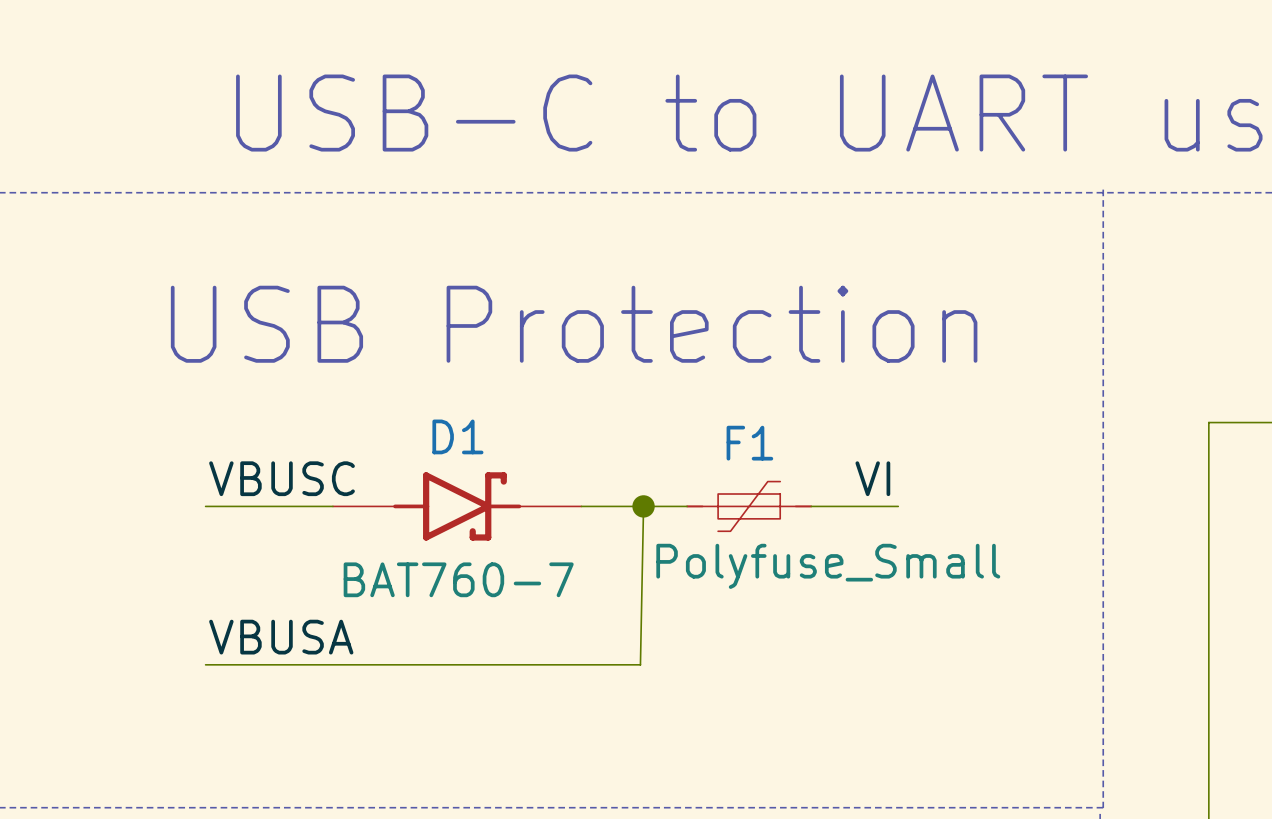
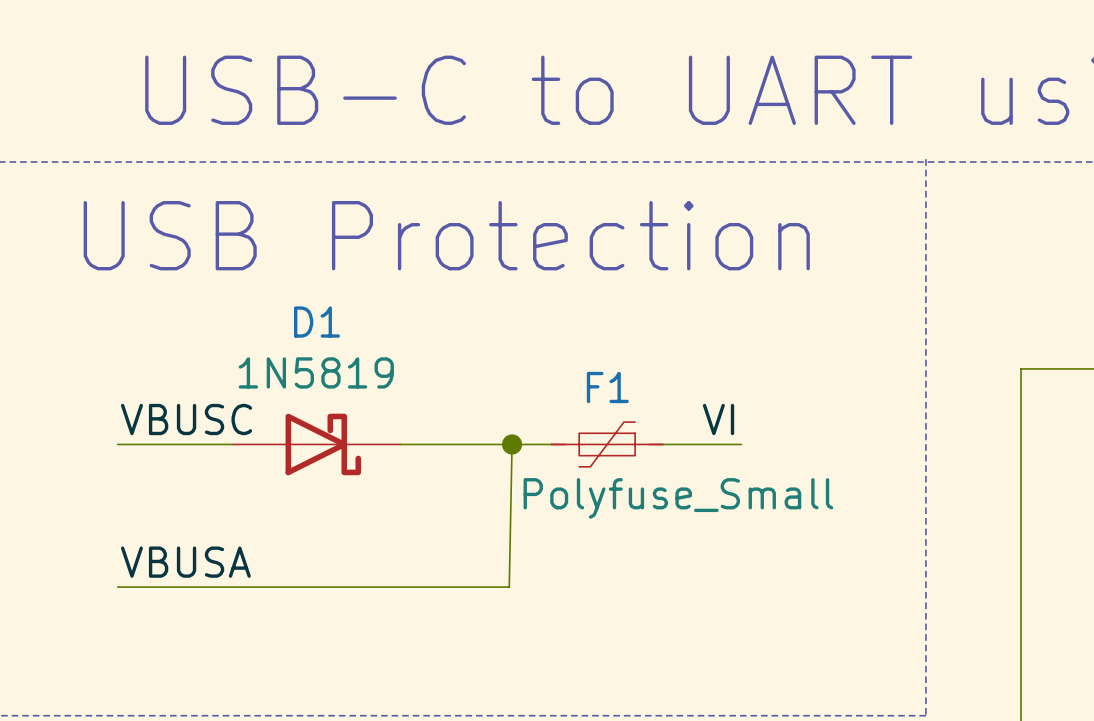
text position: USB Protection (574, 324) -> USB Protection (446, 235)
D1 name position: D1 (457, 436) -> D1 (316, 322)
D1 symbol: [332, 472, 582, 541] -> [232, 413, 401, 476]
D1 value: BAT760-7 (458, 579) -> 1N5819 (316, 372)

